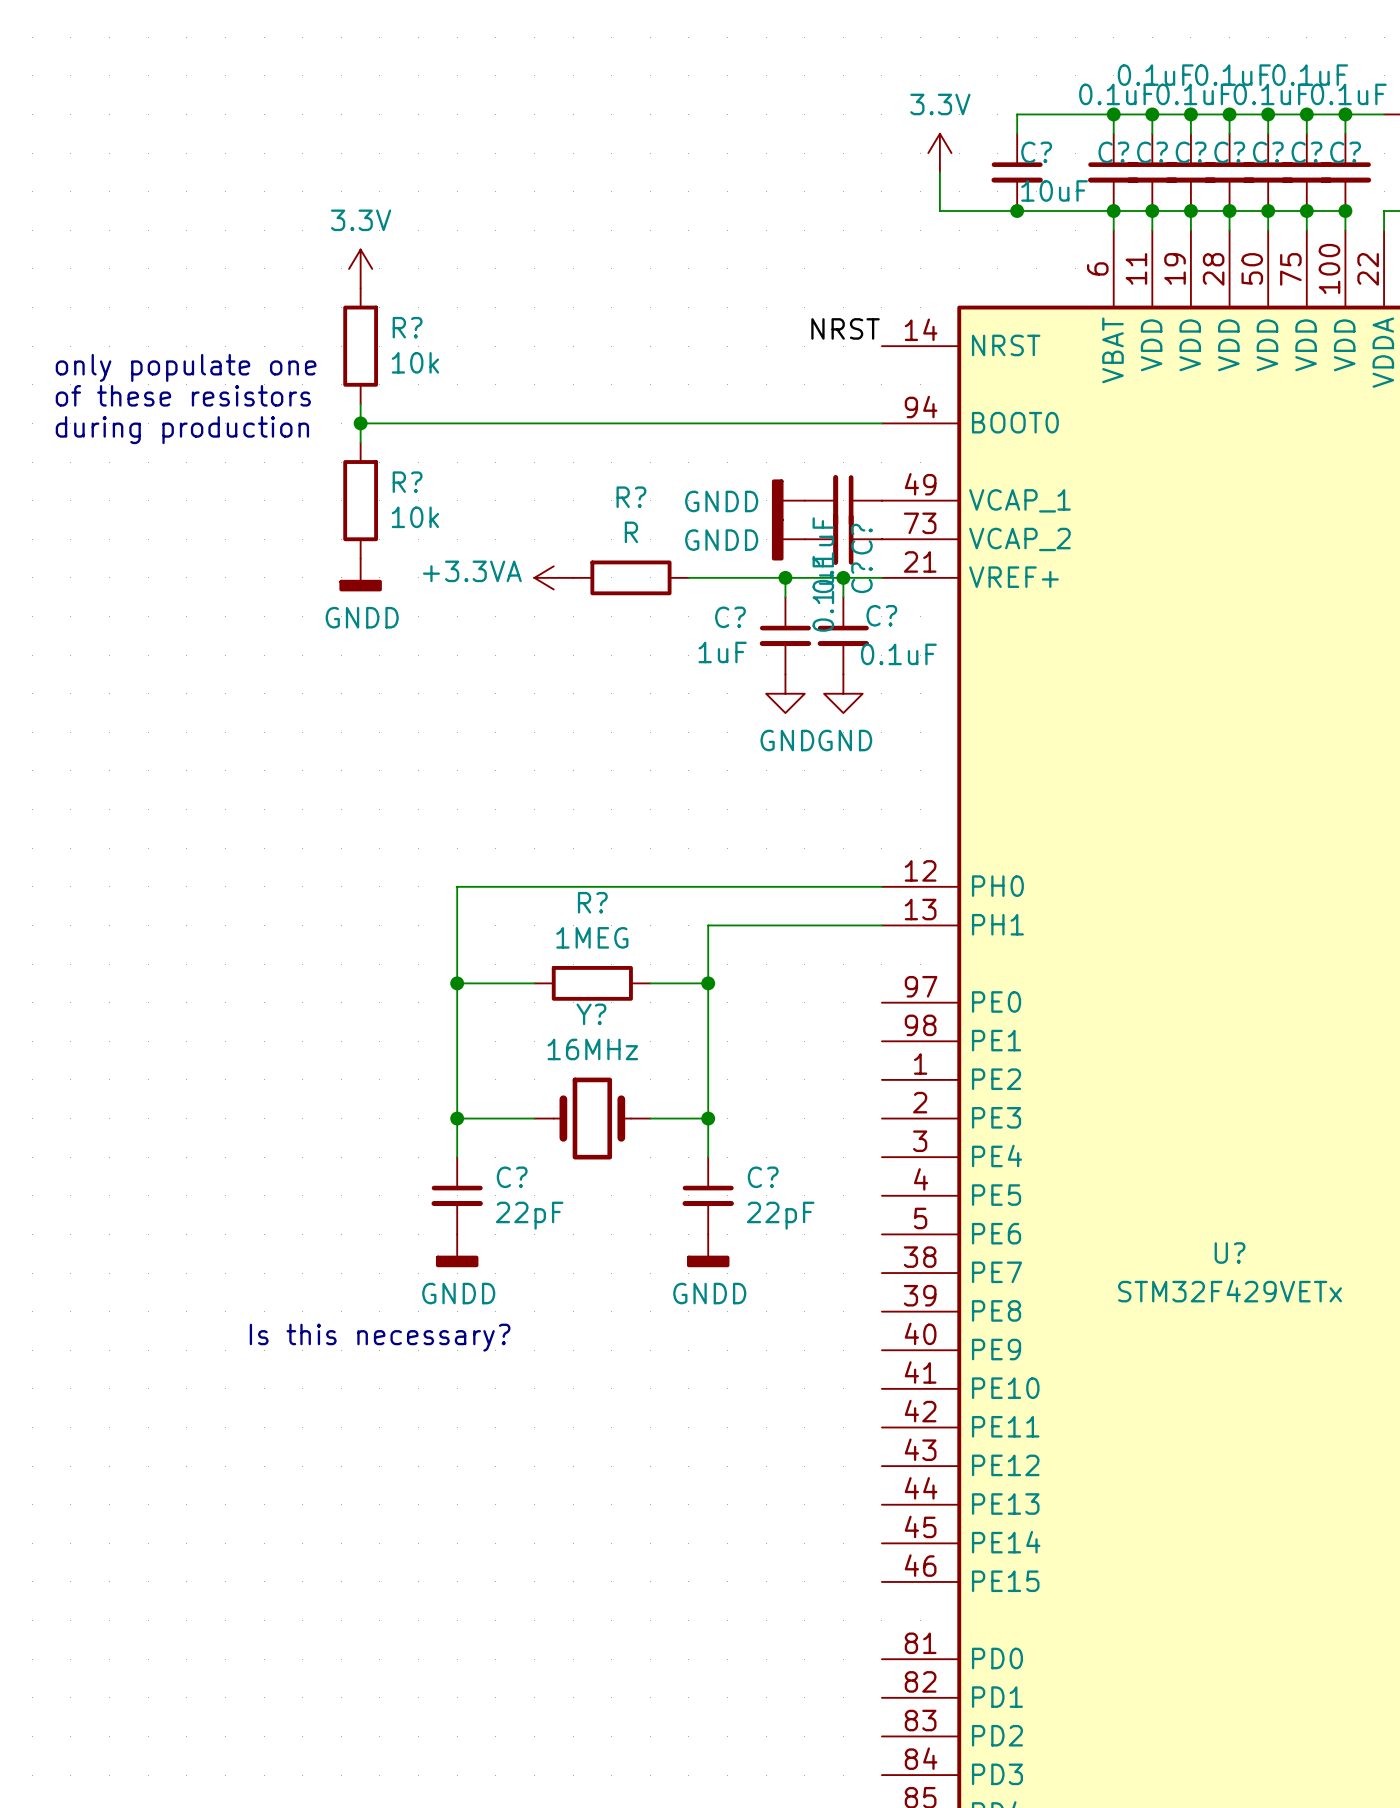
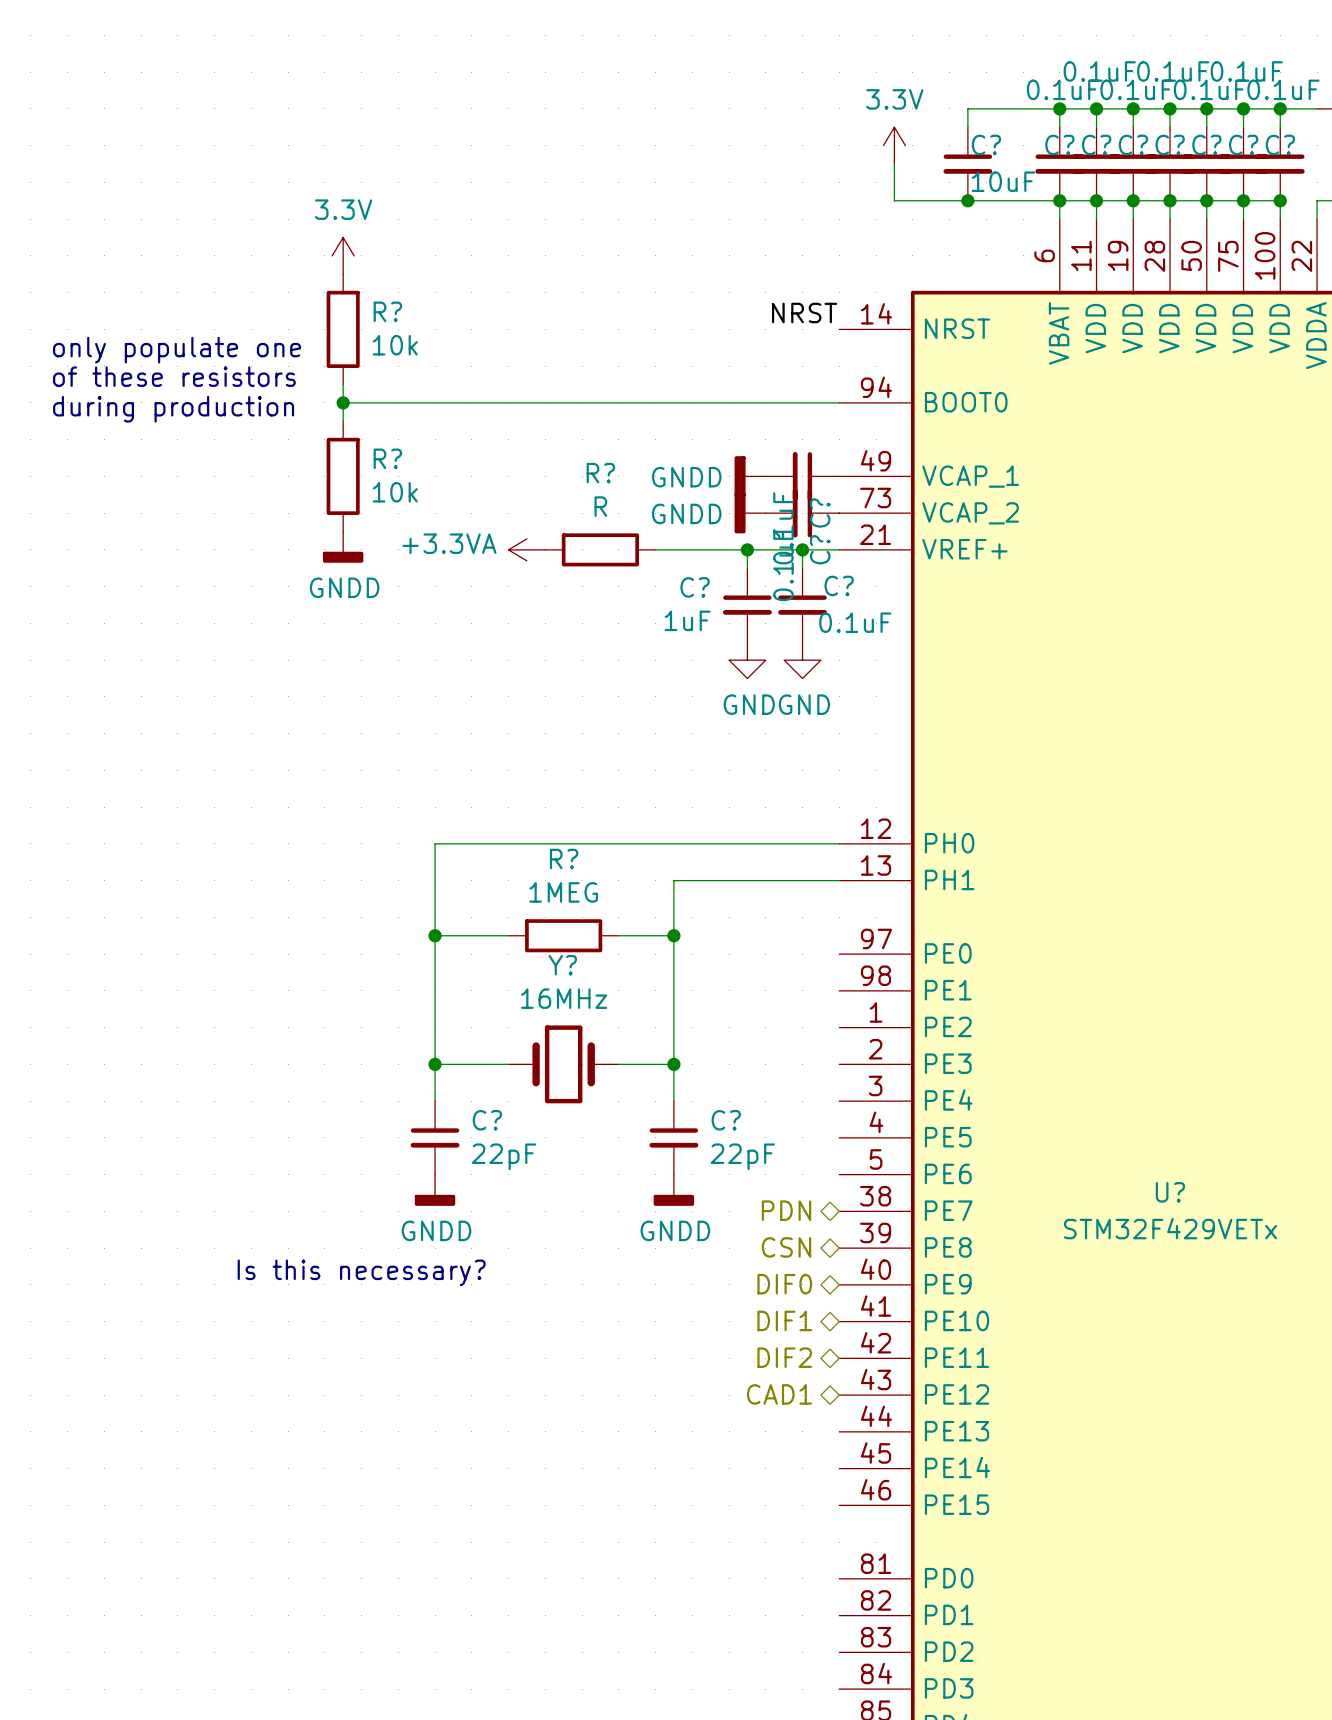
hierarchical label: none -> PDN (786, 1210)
hierarchical label: none -> CSN (786, 1247)
hierarchical label: none -> DIF0 (784, 1284)
hierarchical label: none -> DIF1 (784, 1320)
hierarchical label: none -> DIF2 (784, 1357)
hierarchical label: none -> CAD1 (779, 1394)

